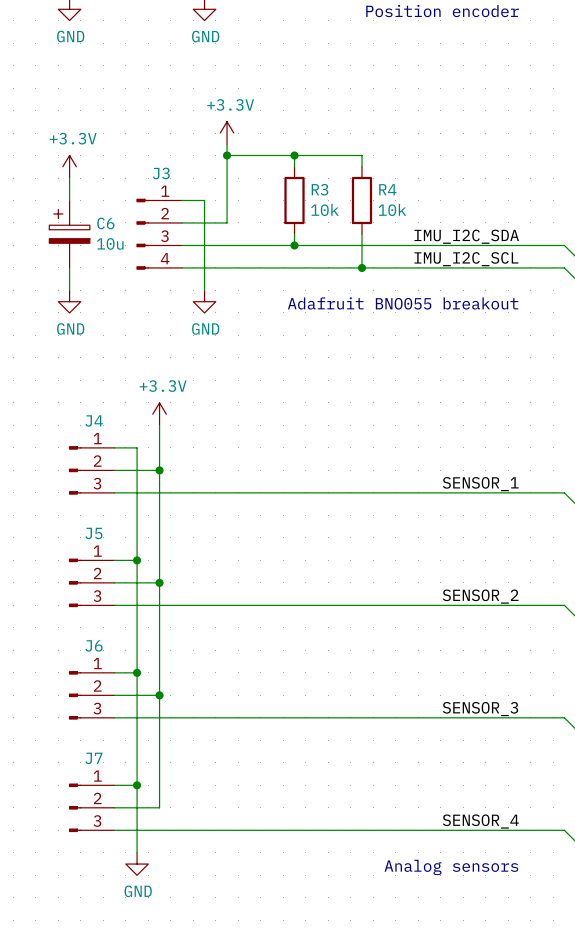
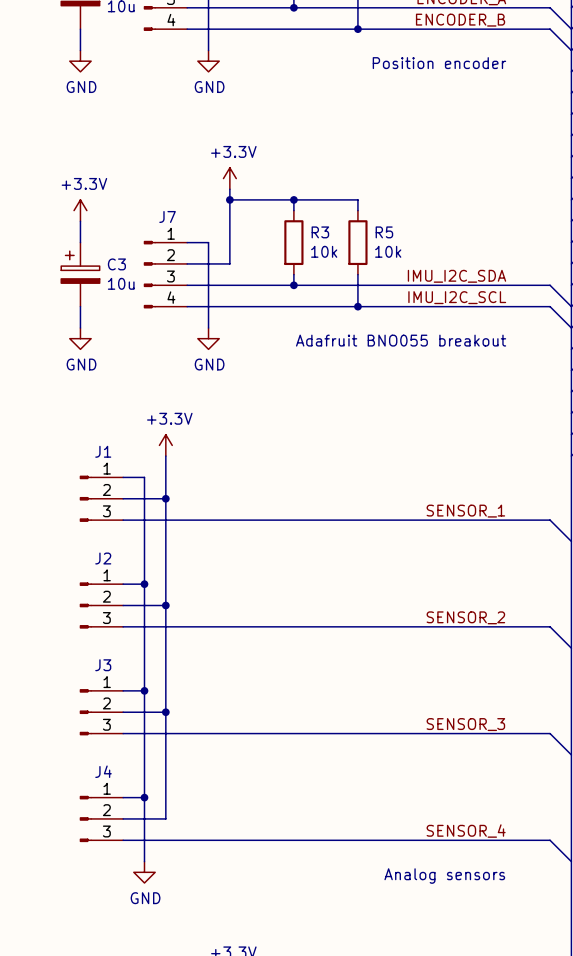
J3 name: J3 (161, 173) -> J7 (167, 216)
R4 name: R4 (387, 189) -> R5 (384, 232)
C6 name: C6 (105, 223) -> C3 (116, 264)
J4 name: J4 (94, 420) -> J1 (103, 451)
J5 name: J5 (93, 533) -> J2 (103, 558)
J6 name: J6 (93, 645) -> J3 (103, 665)
J7 name: J7 (93, 758) -> J4 (103, 771)

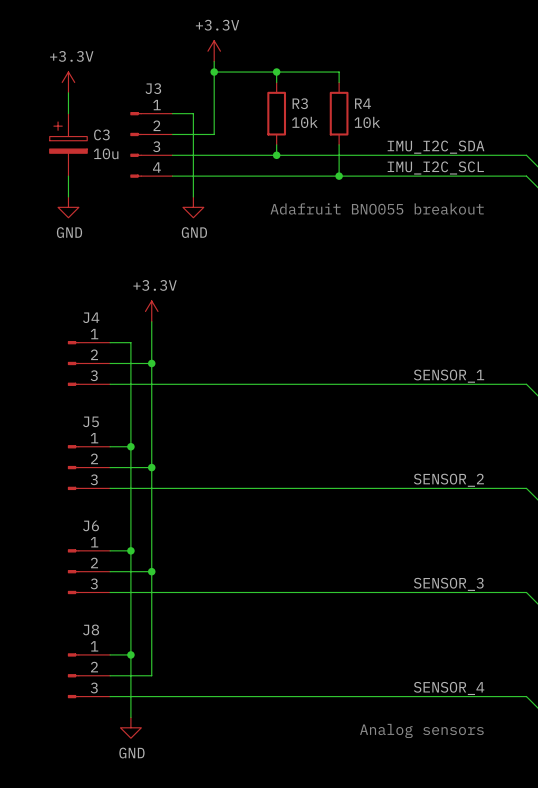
J7 name: J7 (167, 216) -> J3 (153, 88)
R5 name: R5 (384, 232) -> R4 (363, 103)
J1 name: J1 (103, 451) -> J4 (91, 317)
J2 name: J2 (103, 558) -> J5 (91, 421)
J3 name: J3 (103, 665) -> J6 (91, 525)
J4 name: J4 (103, 771) -> J8 (91, 629)

